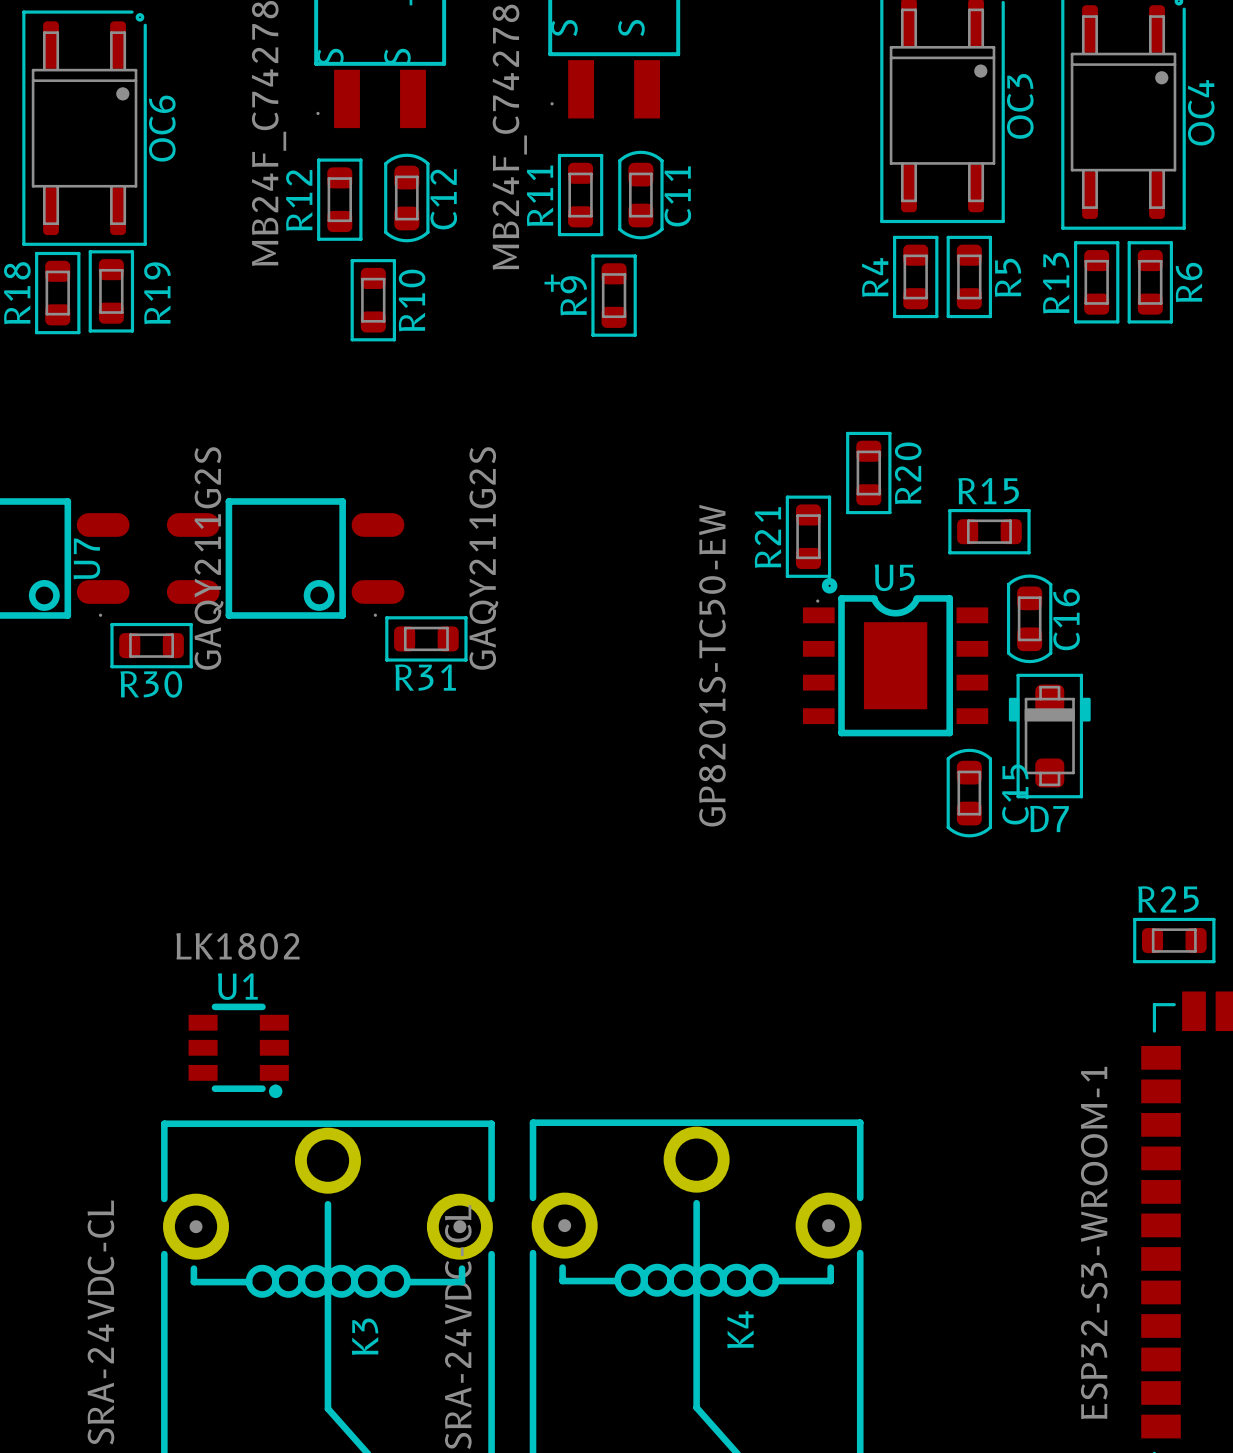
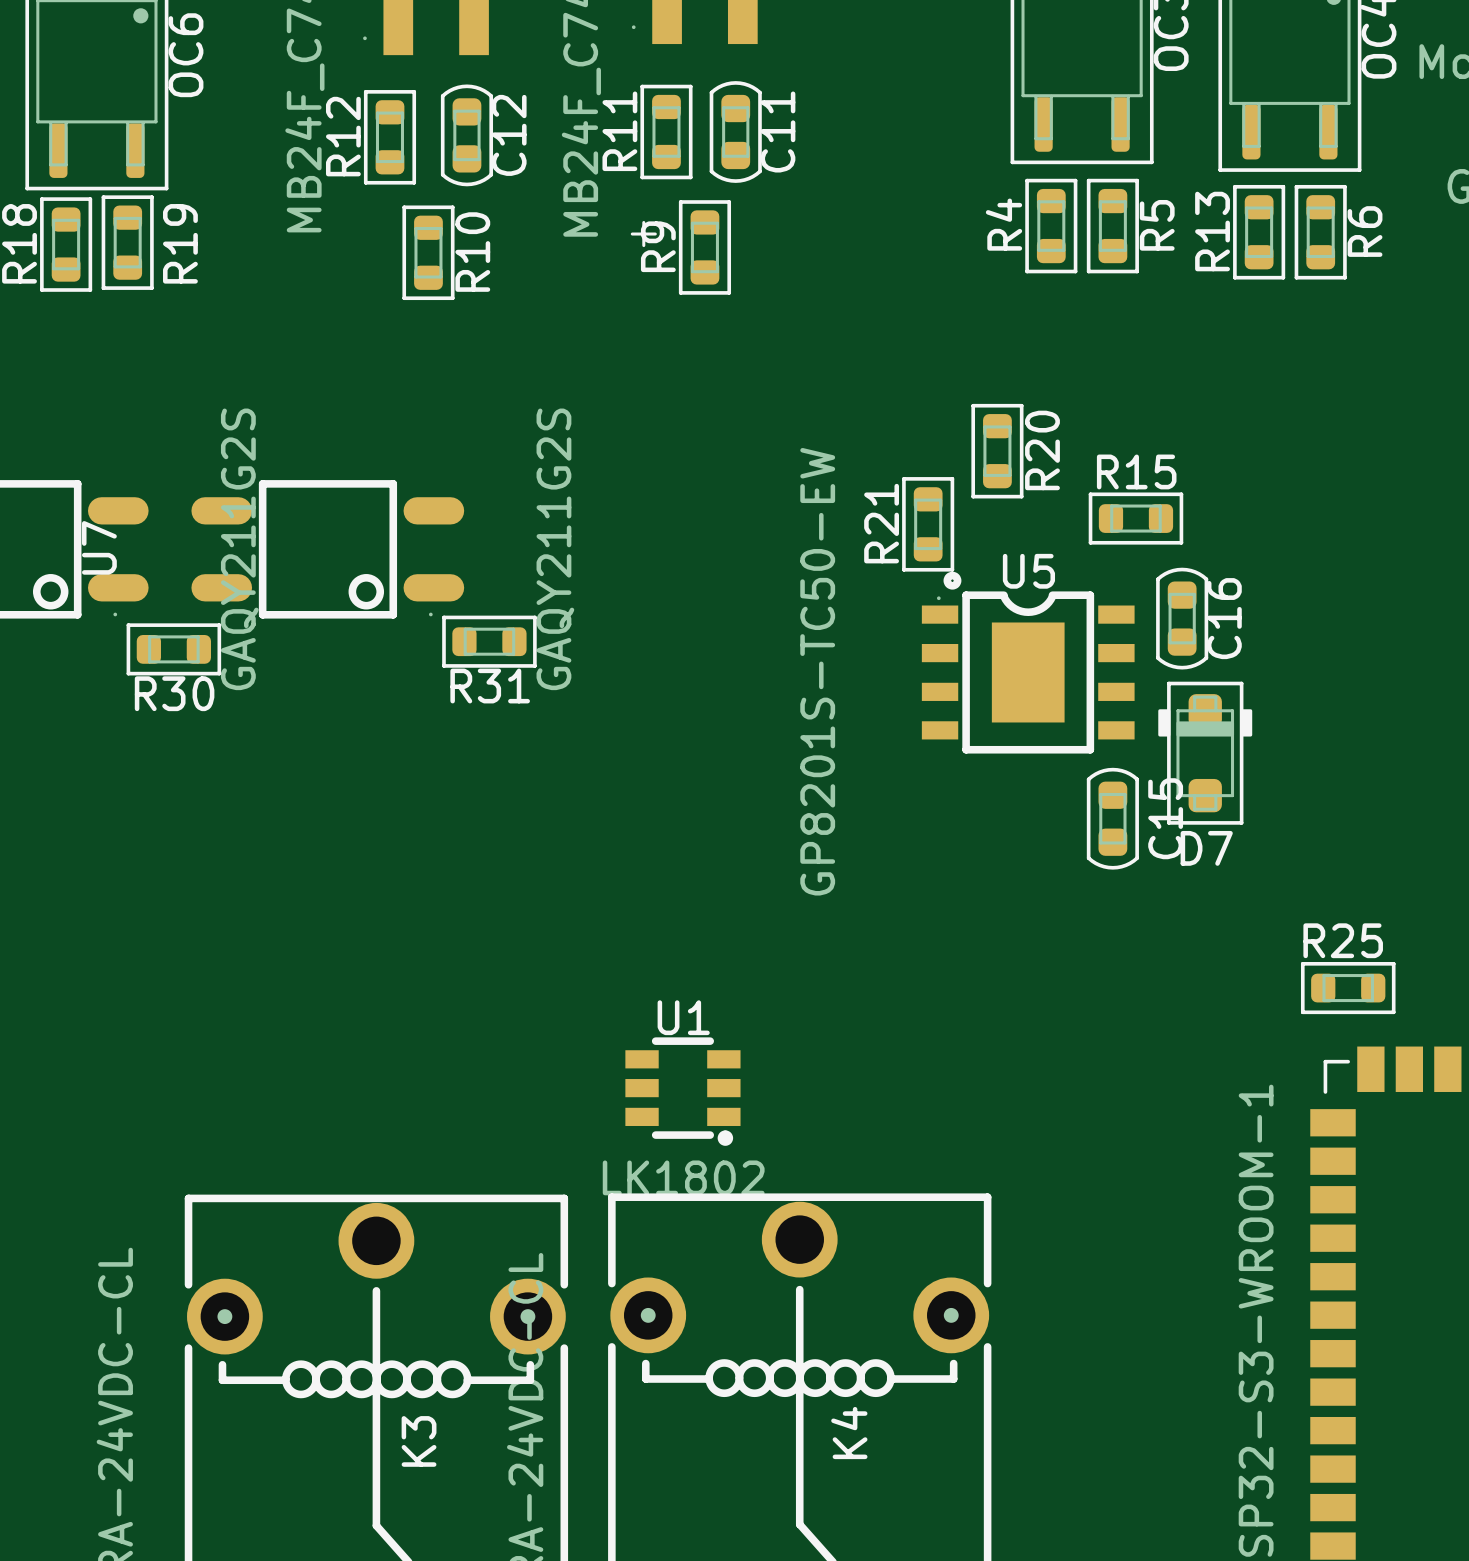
U1 value position: LK1802 (237, 946) -> LK1802 (683, 1177)
U1 position: (238, 1050) -> (682, 1091)

